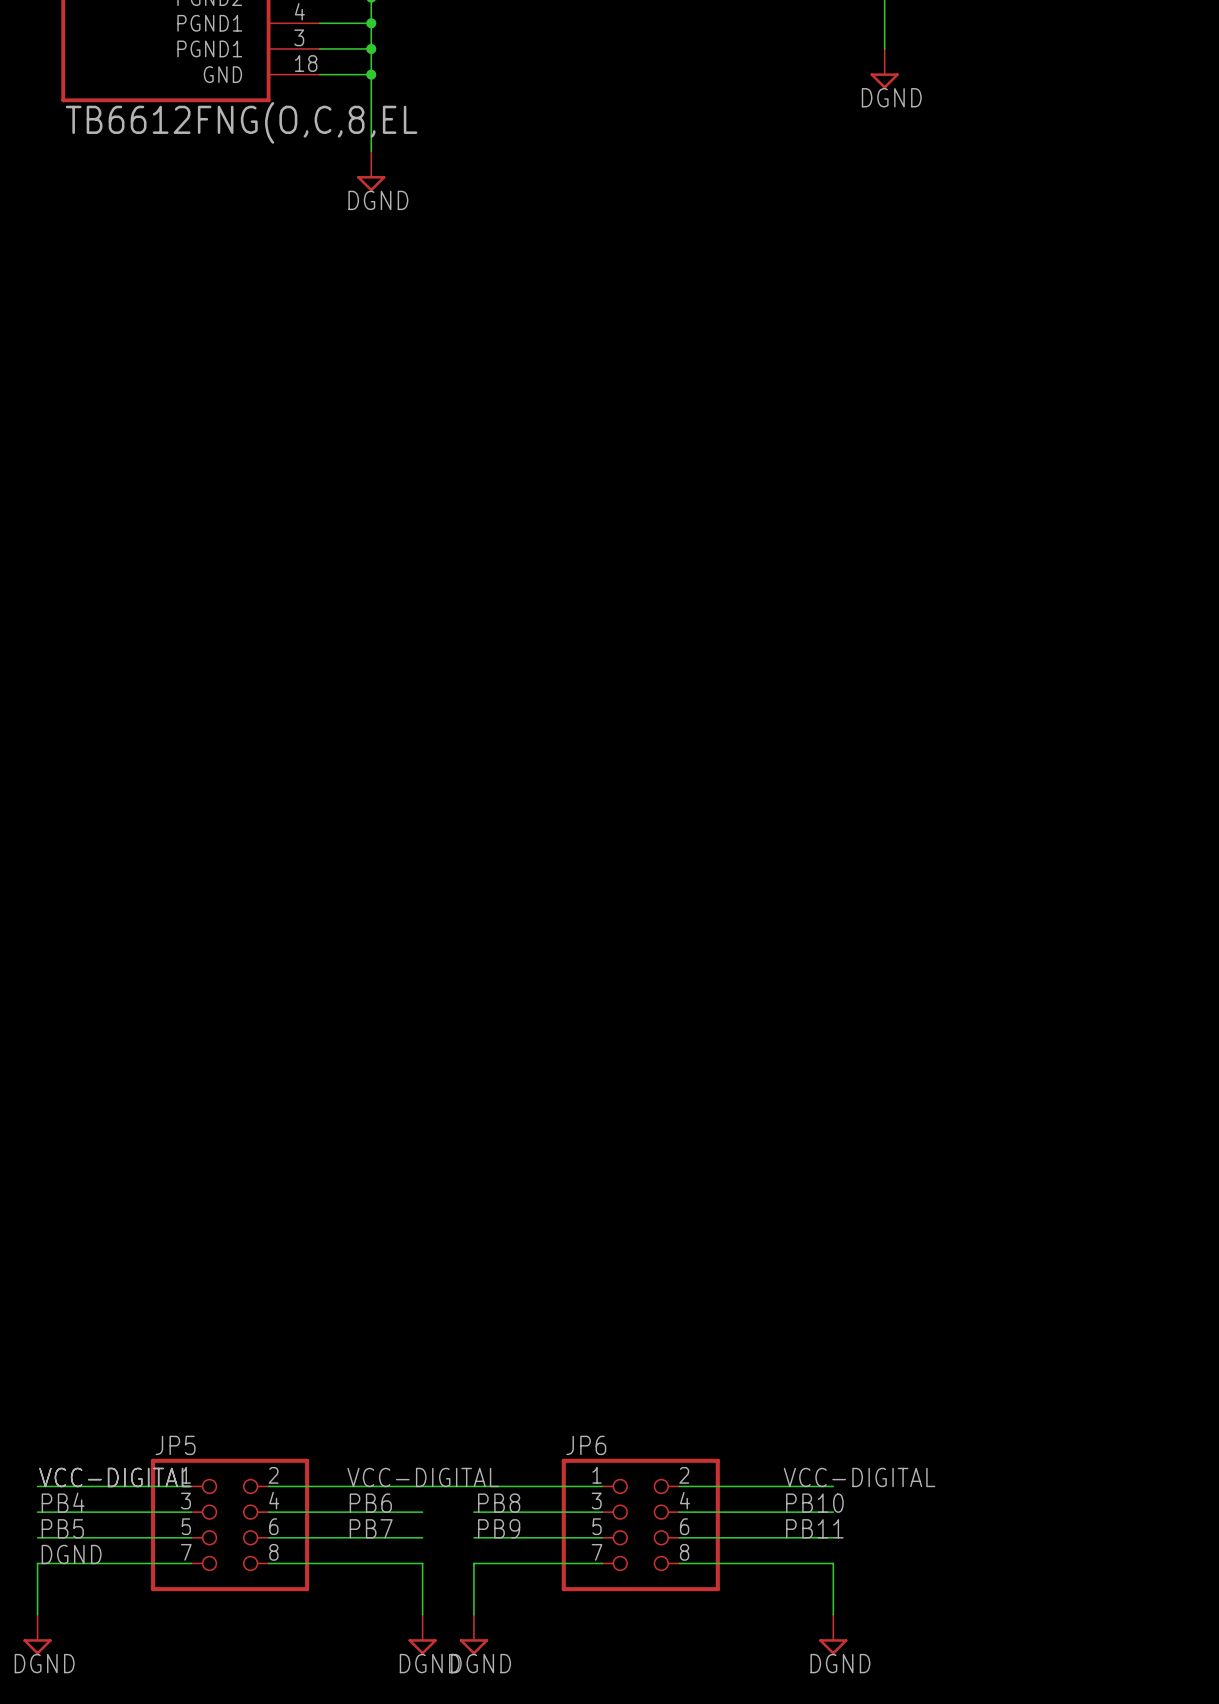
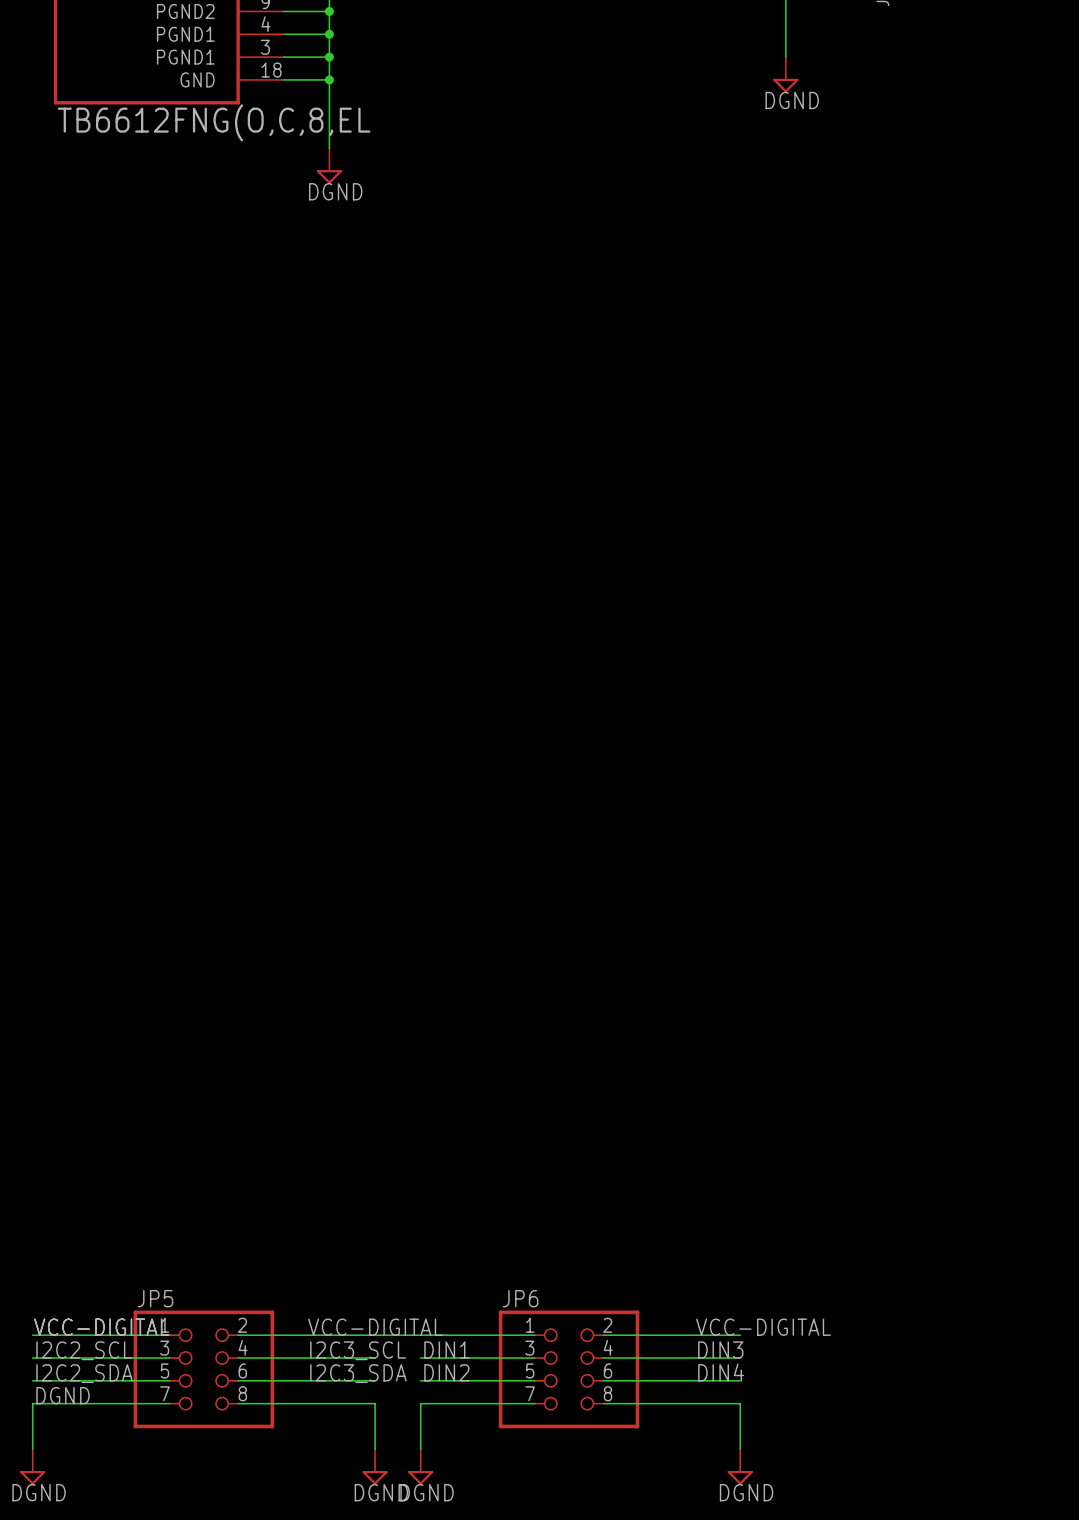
label: PB4 (63, 1502) -> I2C2_SCL (84, 1350)
label: PB6 (370, 1503) -> I2C3_SCL (358, 1350)
label: PB8 (499, 1503) -> DIN1 (446, 1350)
label: PB10 (814, 1503) -> DIN3 (720, 1350)
label: PB5 (62, 1528) -> I2C2_SDA (84, 1373)
label: PB7 (371, 1528) -> I2C3_SDA (358, 1373)
label: PB9 (499, 1528) -> DIN2 (446, 1372)
label: PB11 (814, 1528) -> DIN4 (721, 1372)

